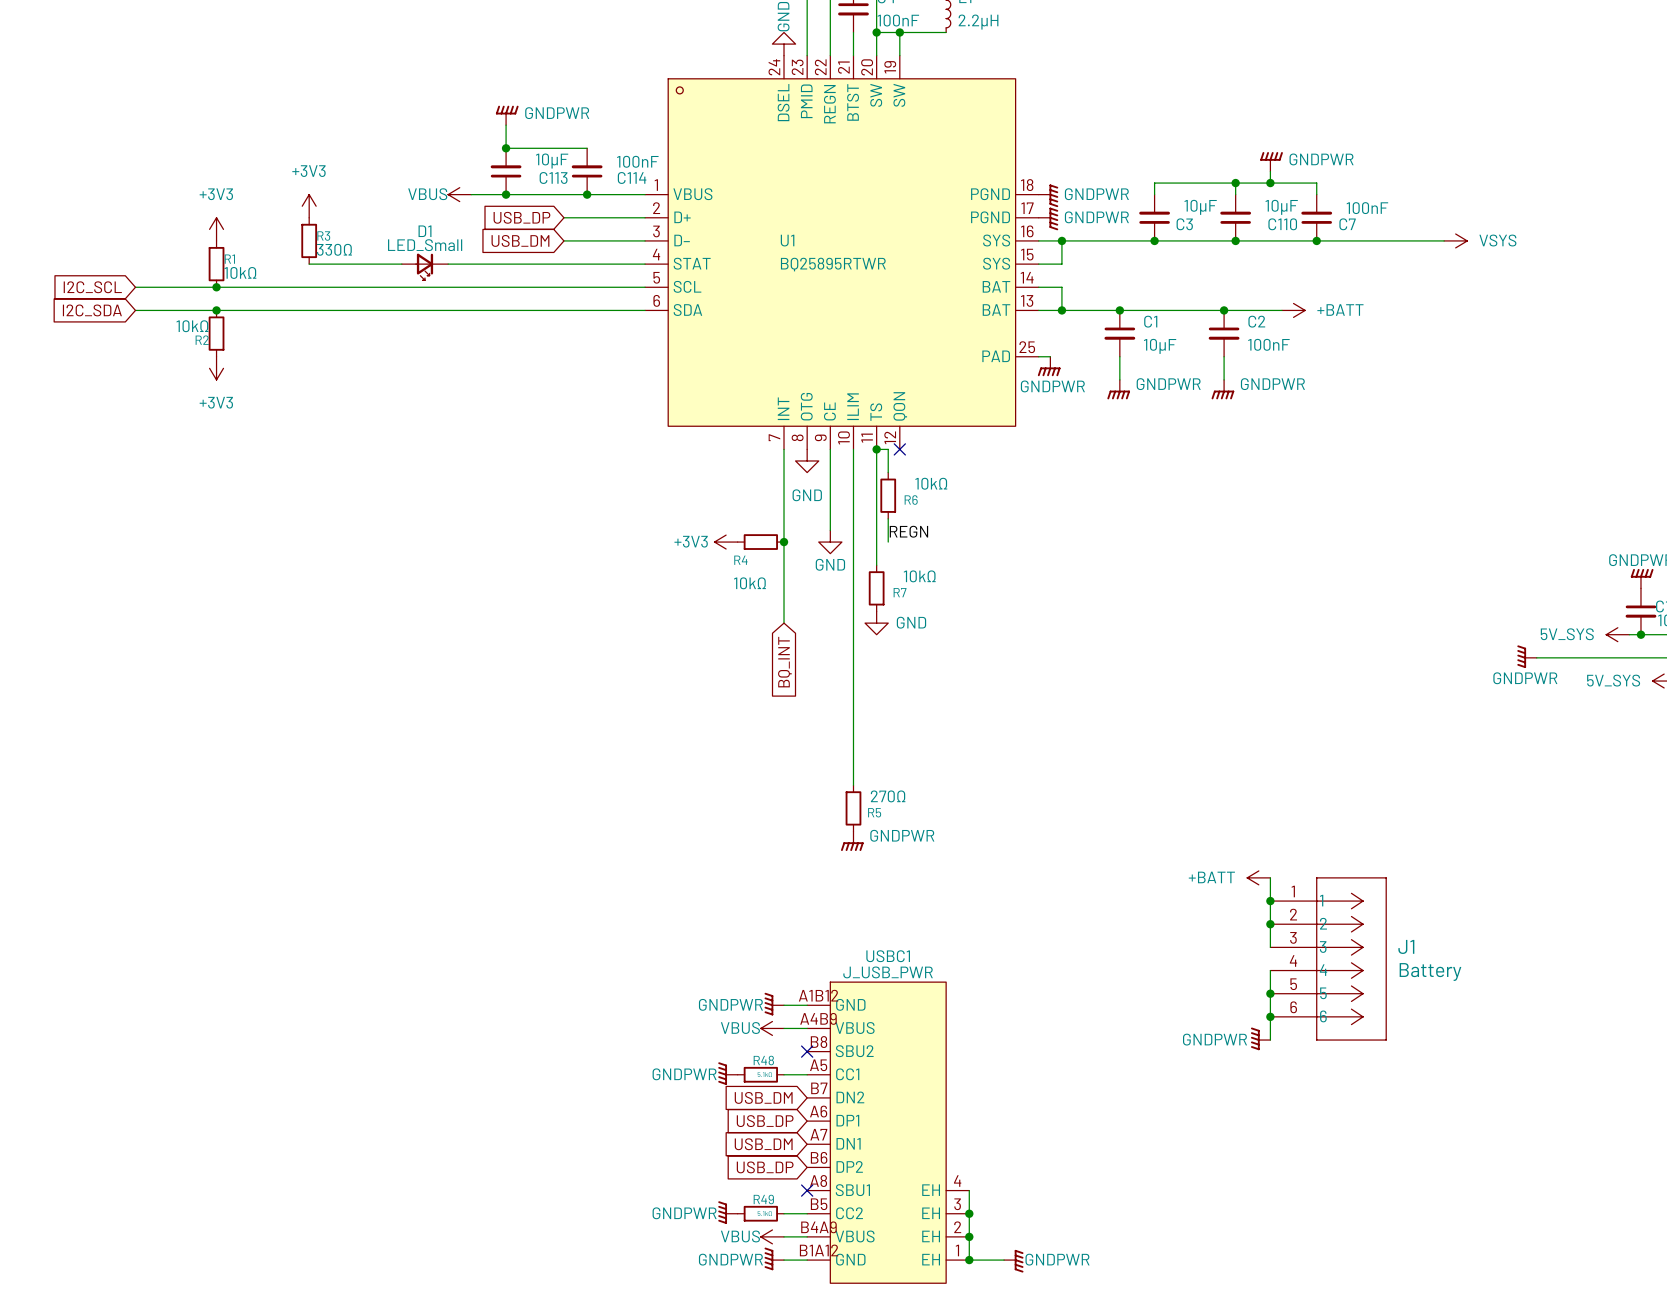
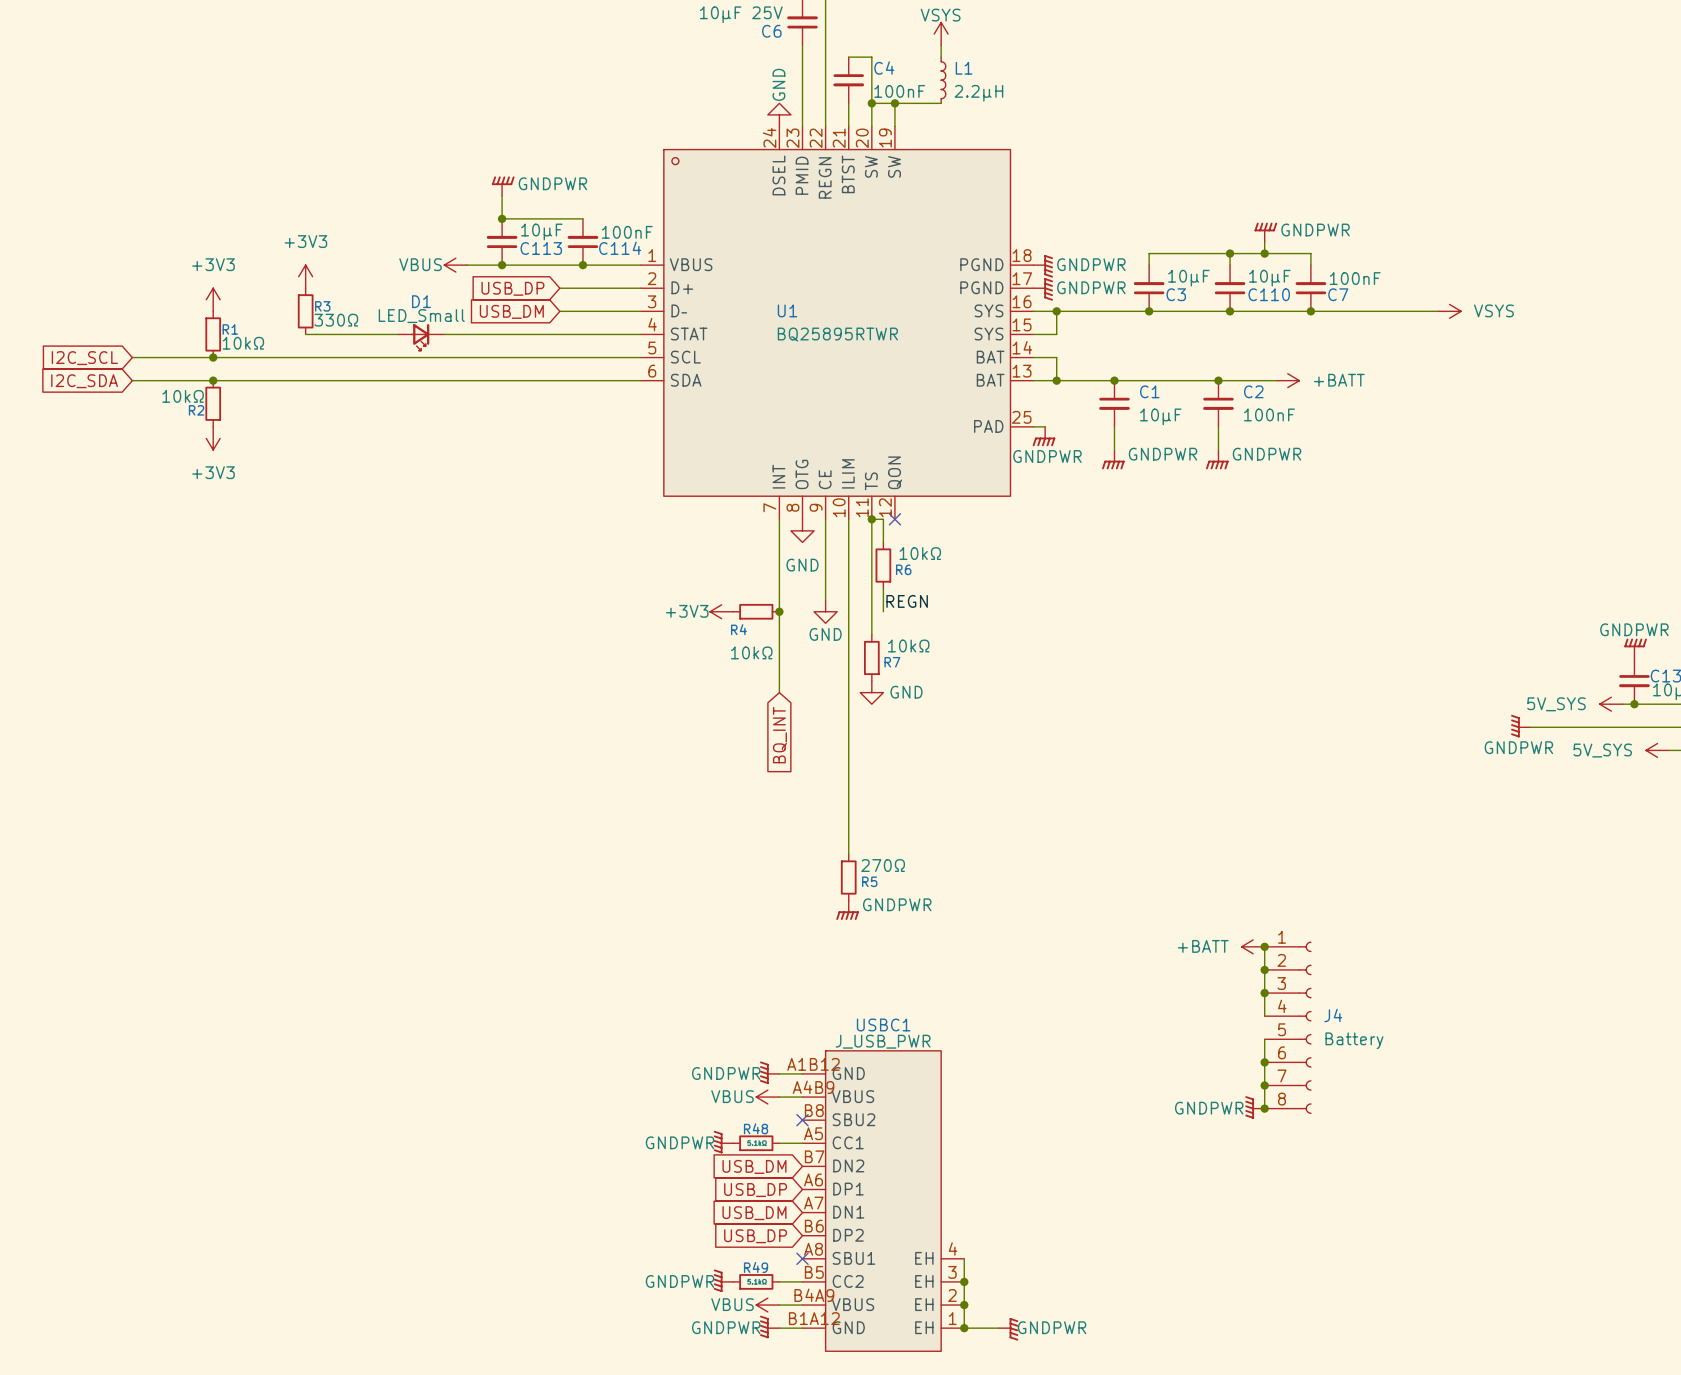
junction: none -> (1264, 946)
J4: none -> Battery (1288, 1027)
J1: Battery (1328, 958) -> none
junction: none -> (1264, 1108)

